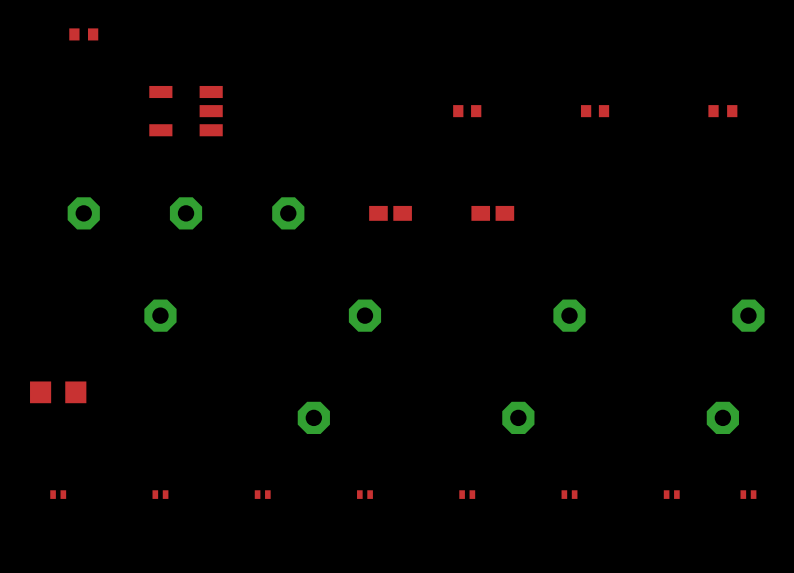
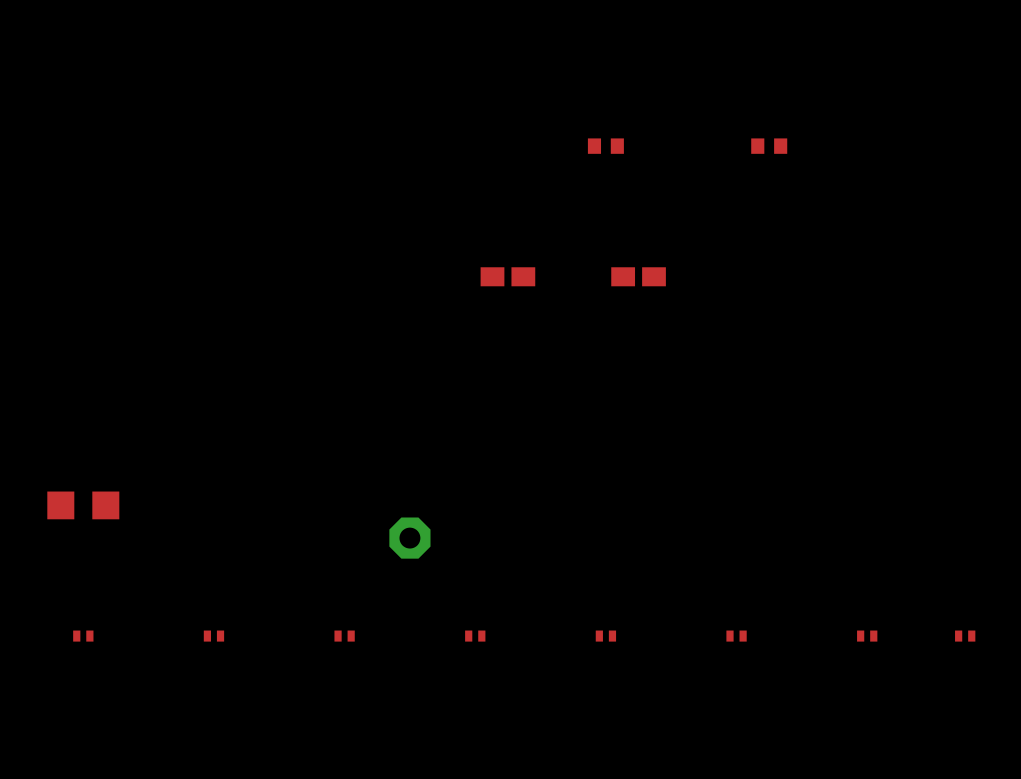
part: (83, 34) -> none
part: (186, 111) -> none
part: (722, 111) -> none
part: (83, 213) -> none
part: (186, 213) -> none
part: (288, 213) -> none
part: (160, 315) -> none
part: (364, 315) -> none
part: (569, 315) -> none
part: (748, 315) -> none
part: (518, 417) -> none
part: (722, 417) -> none

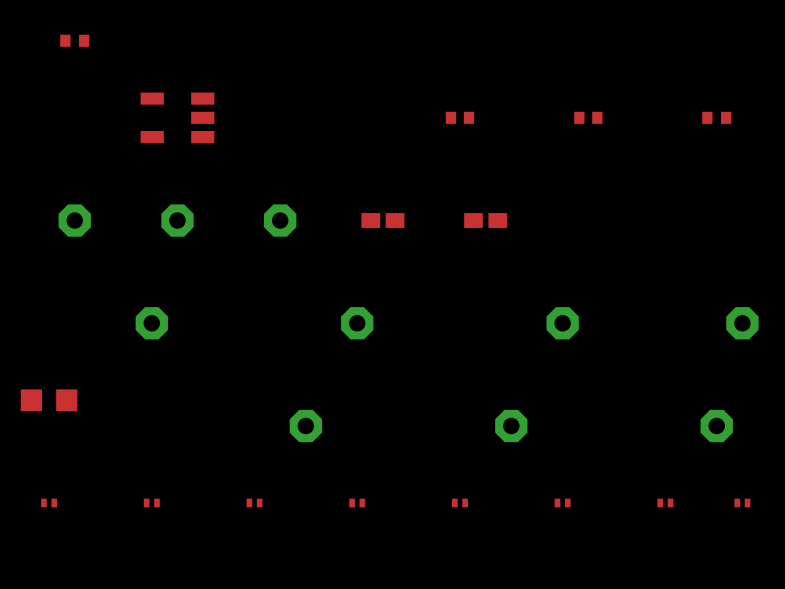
part: none -> (74, 40)
part: none -> (177, 117)
part: none -> (716, 117)
part: none -> (74, 220)
part: none -> (177, 220)
part: none -> (280, 220)
part: none -> (151, 323)
part: none -> (357, 323)
part: none -> (562, 323)
part: none -> (742, 323)
part: none -> (511, 425)
part: none -> (716, 425)

